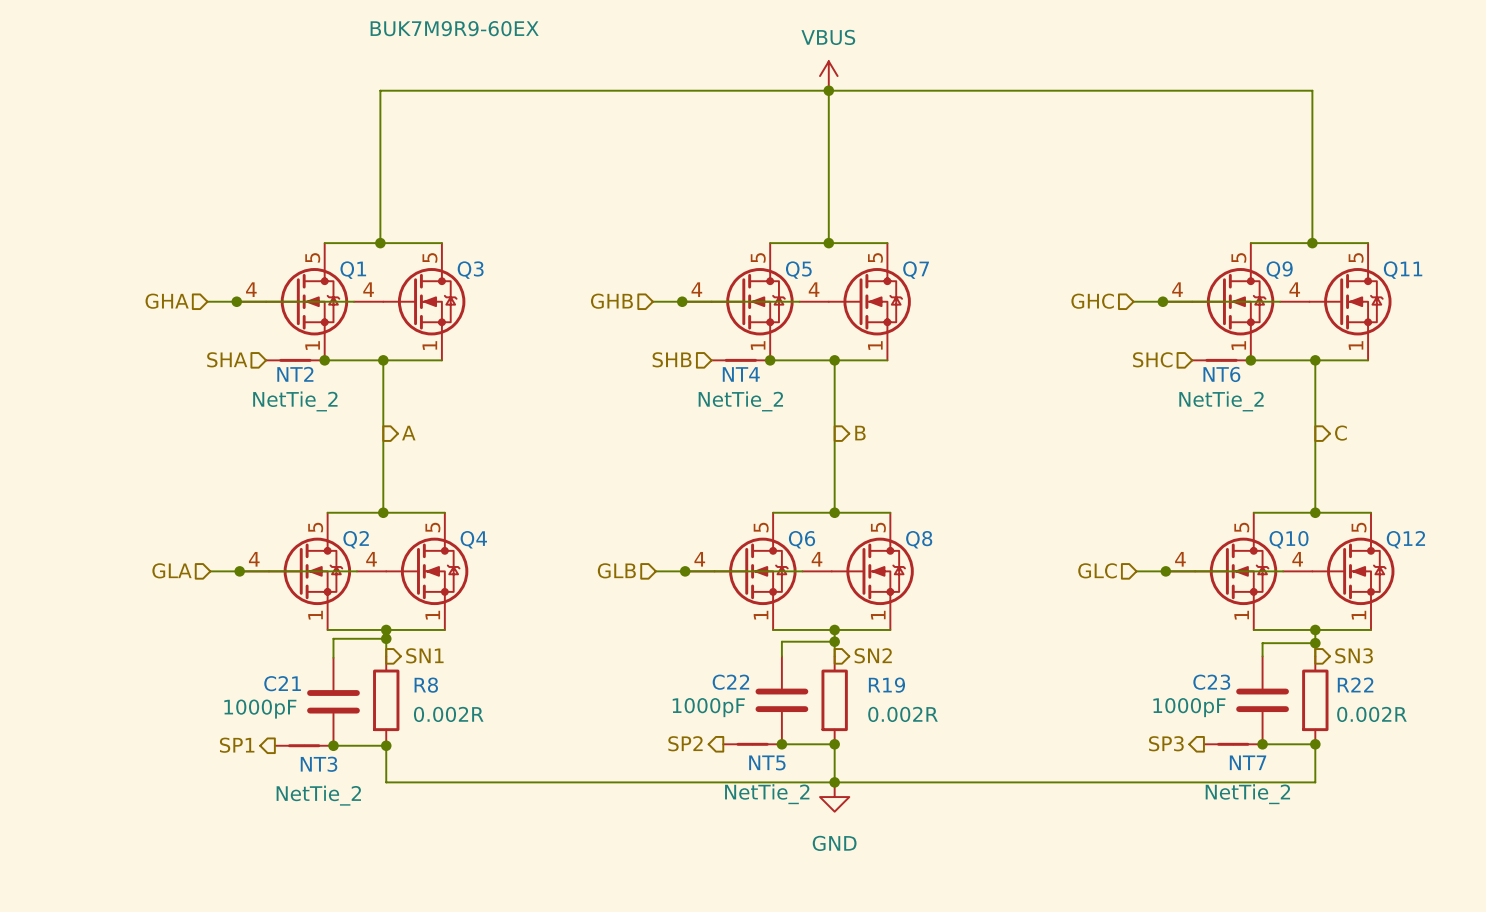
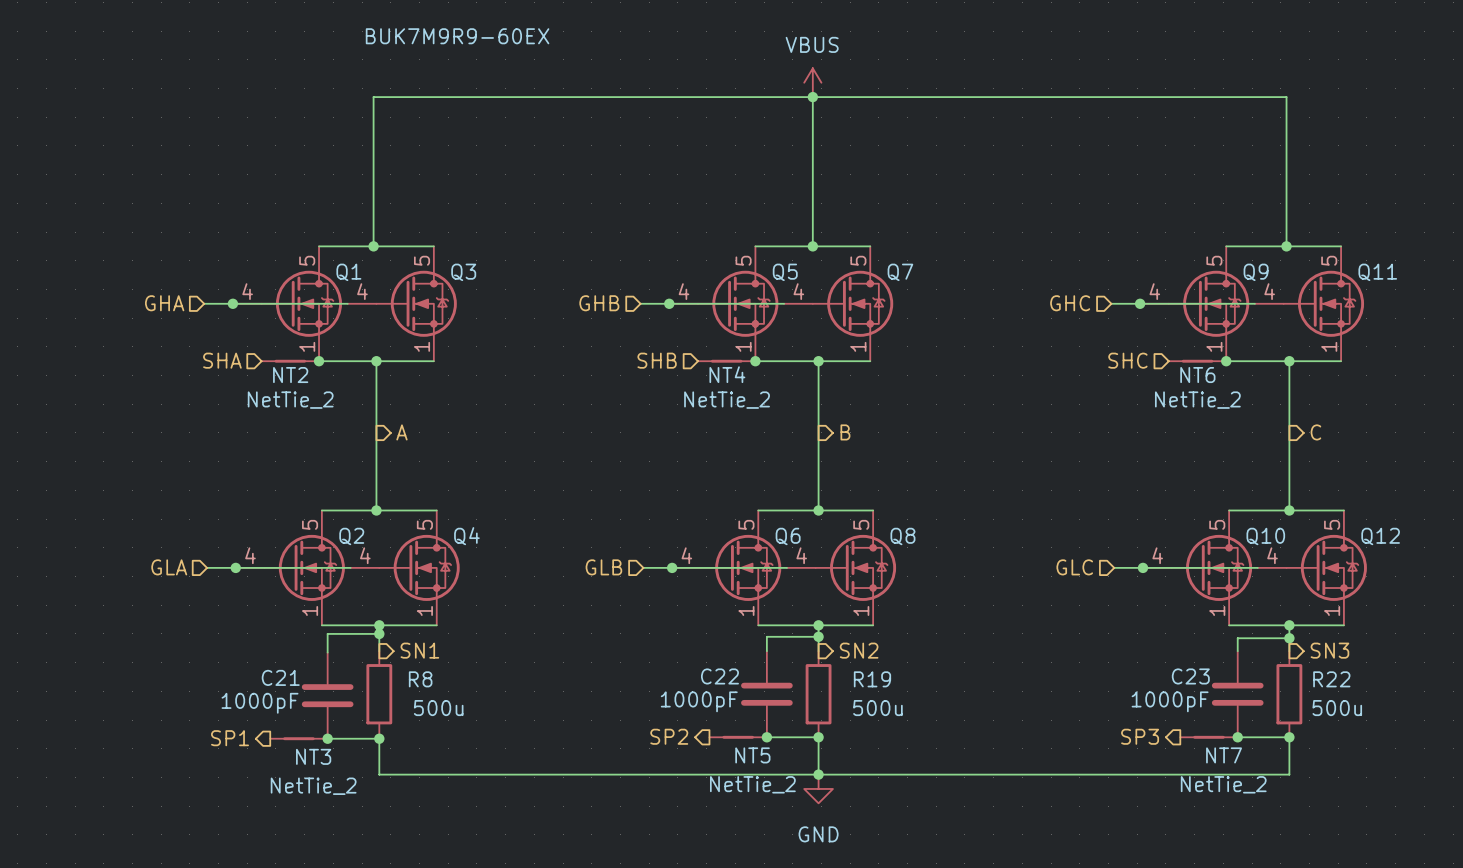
R8 value: 0.002R (448, 714) -> 500u (438, 708)
R19 value: 0.002R (903, 714) -> 500u (877, 708)
R22 value: 0.002R (1371, 714) -> 500u (1337, 708)

